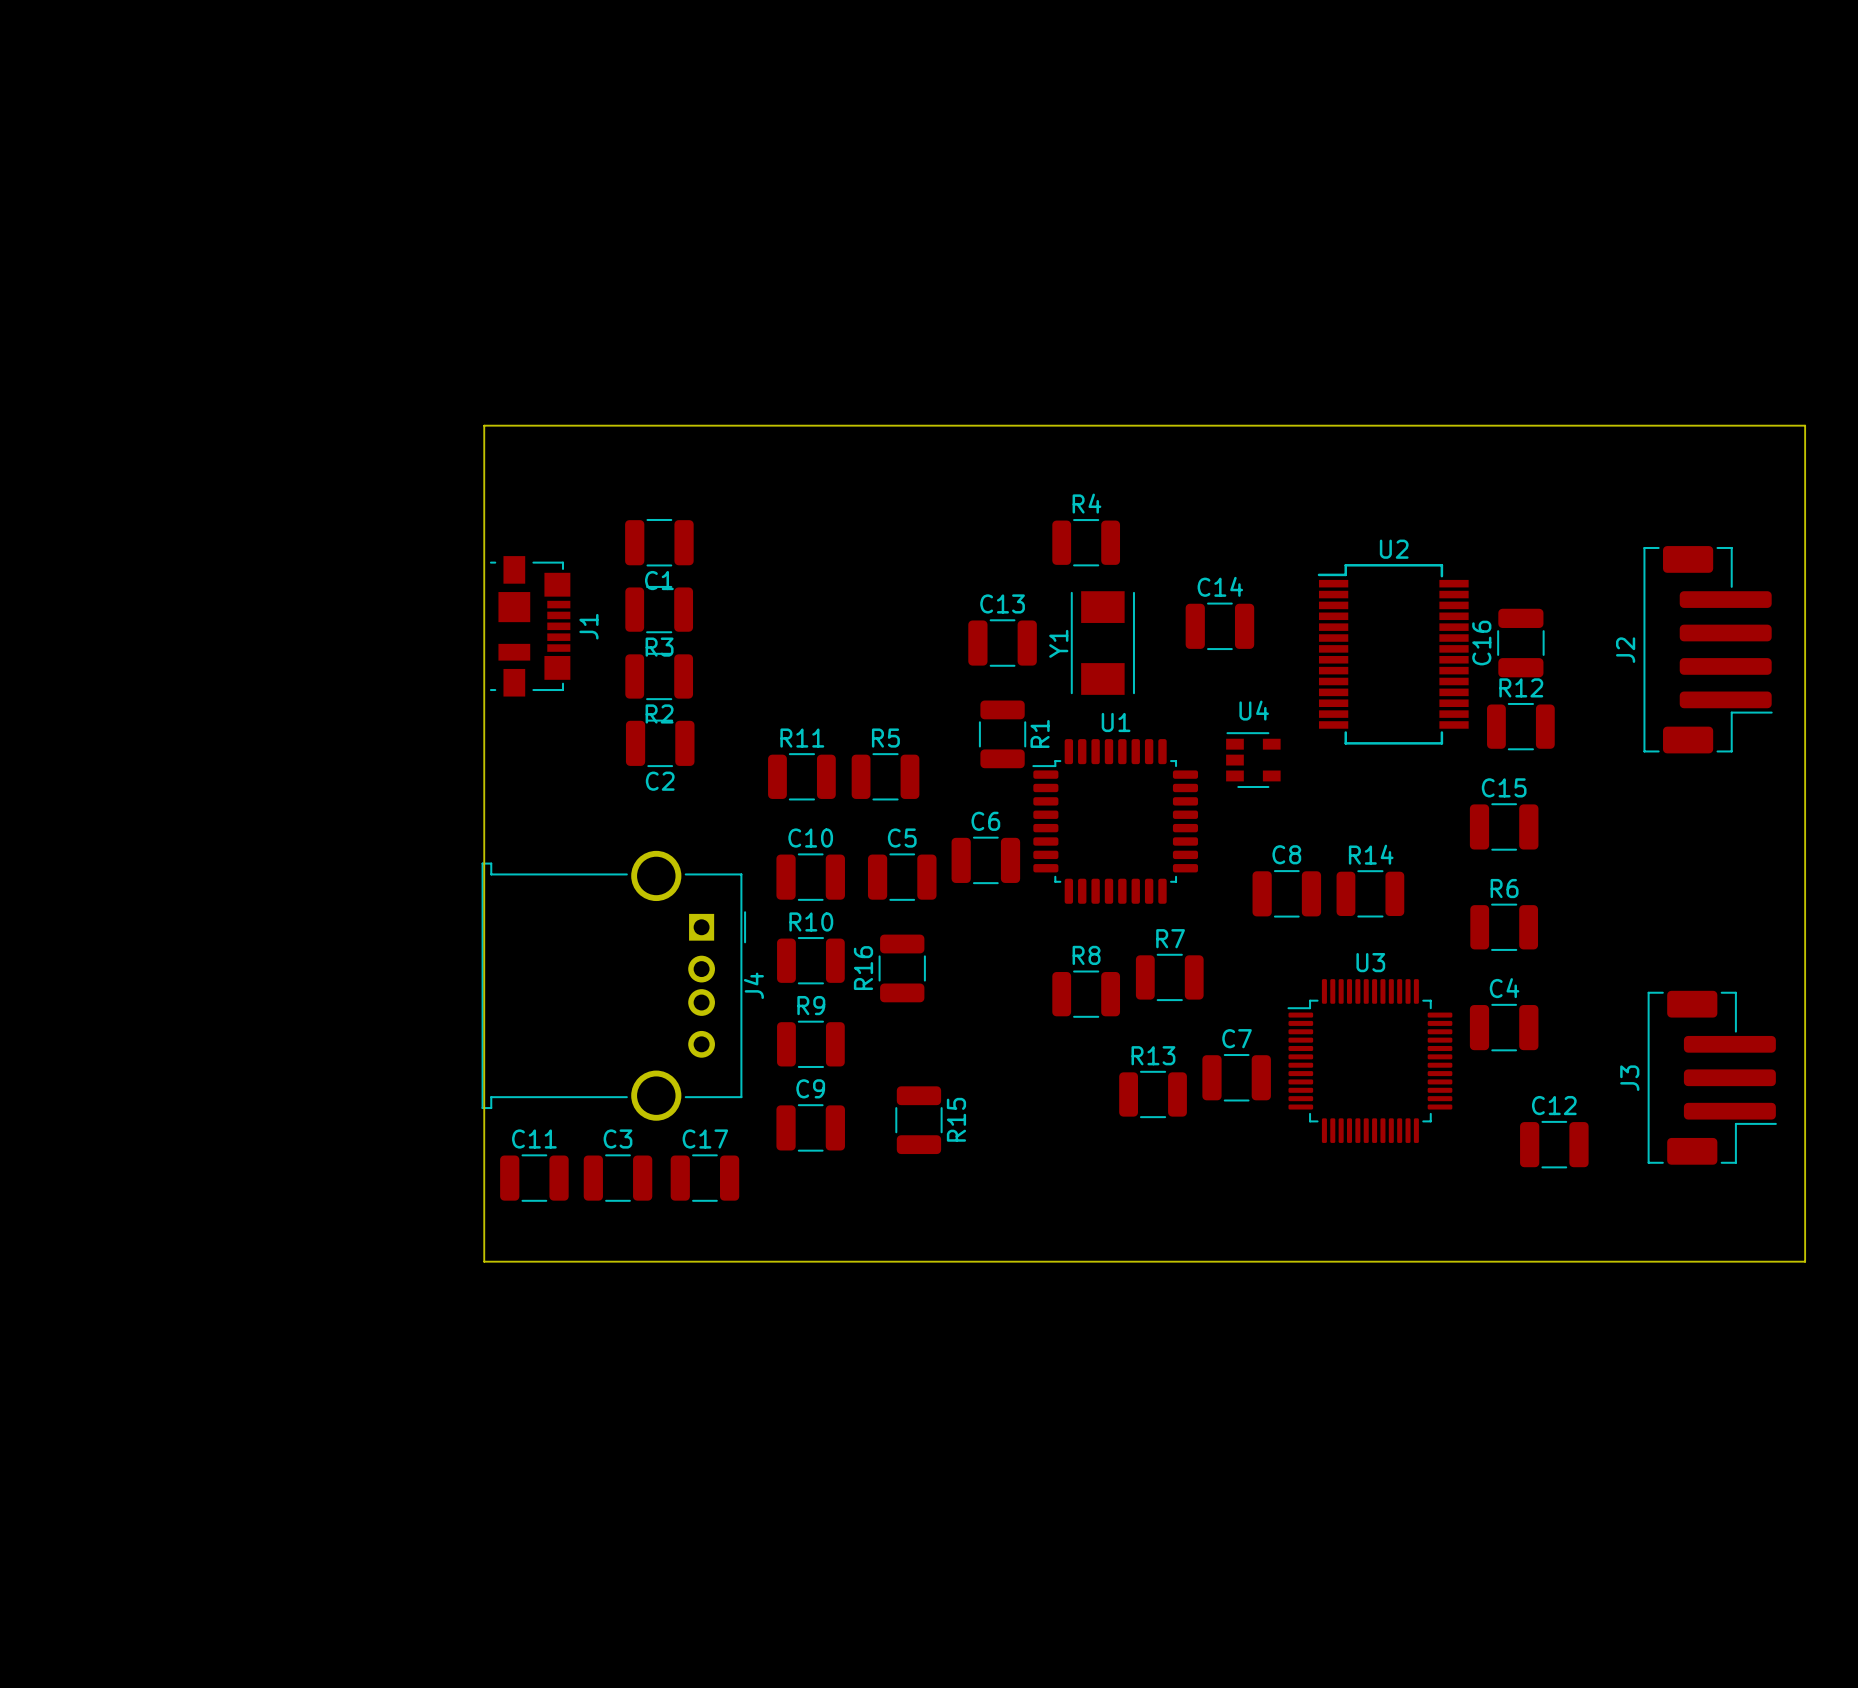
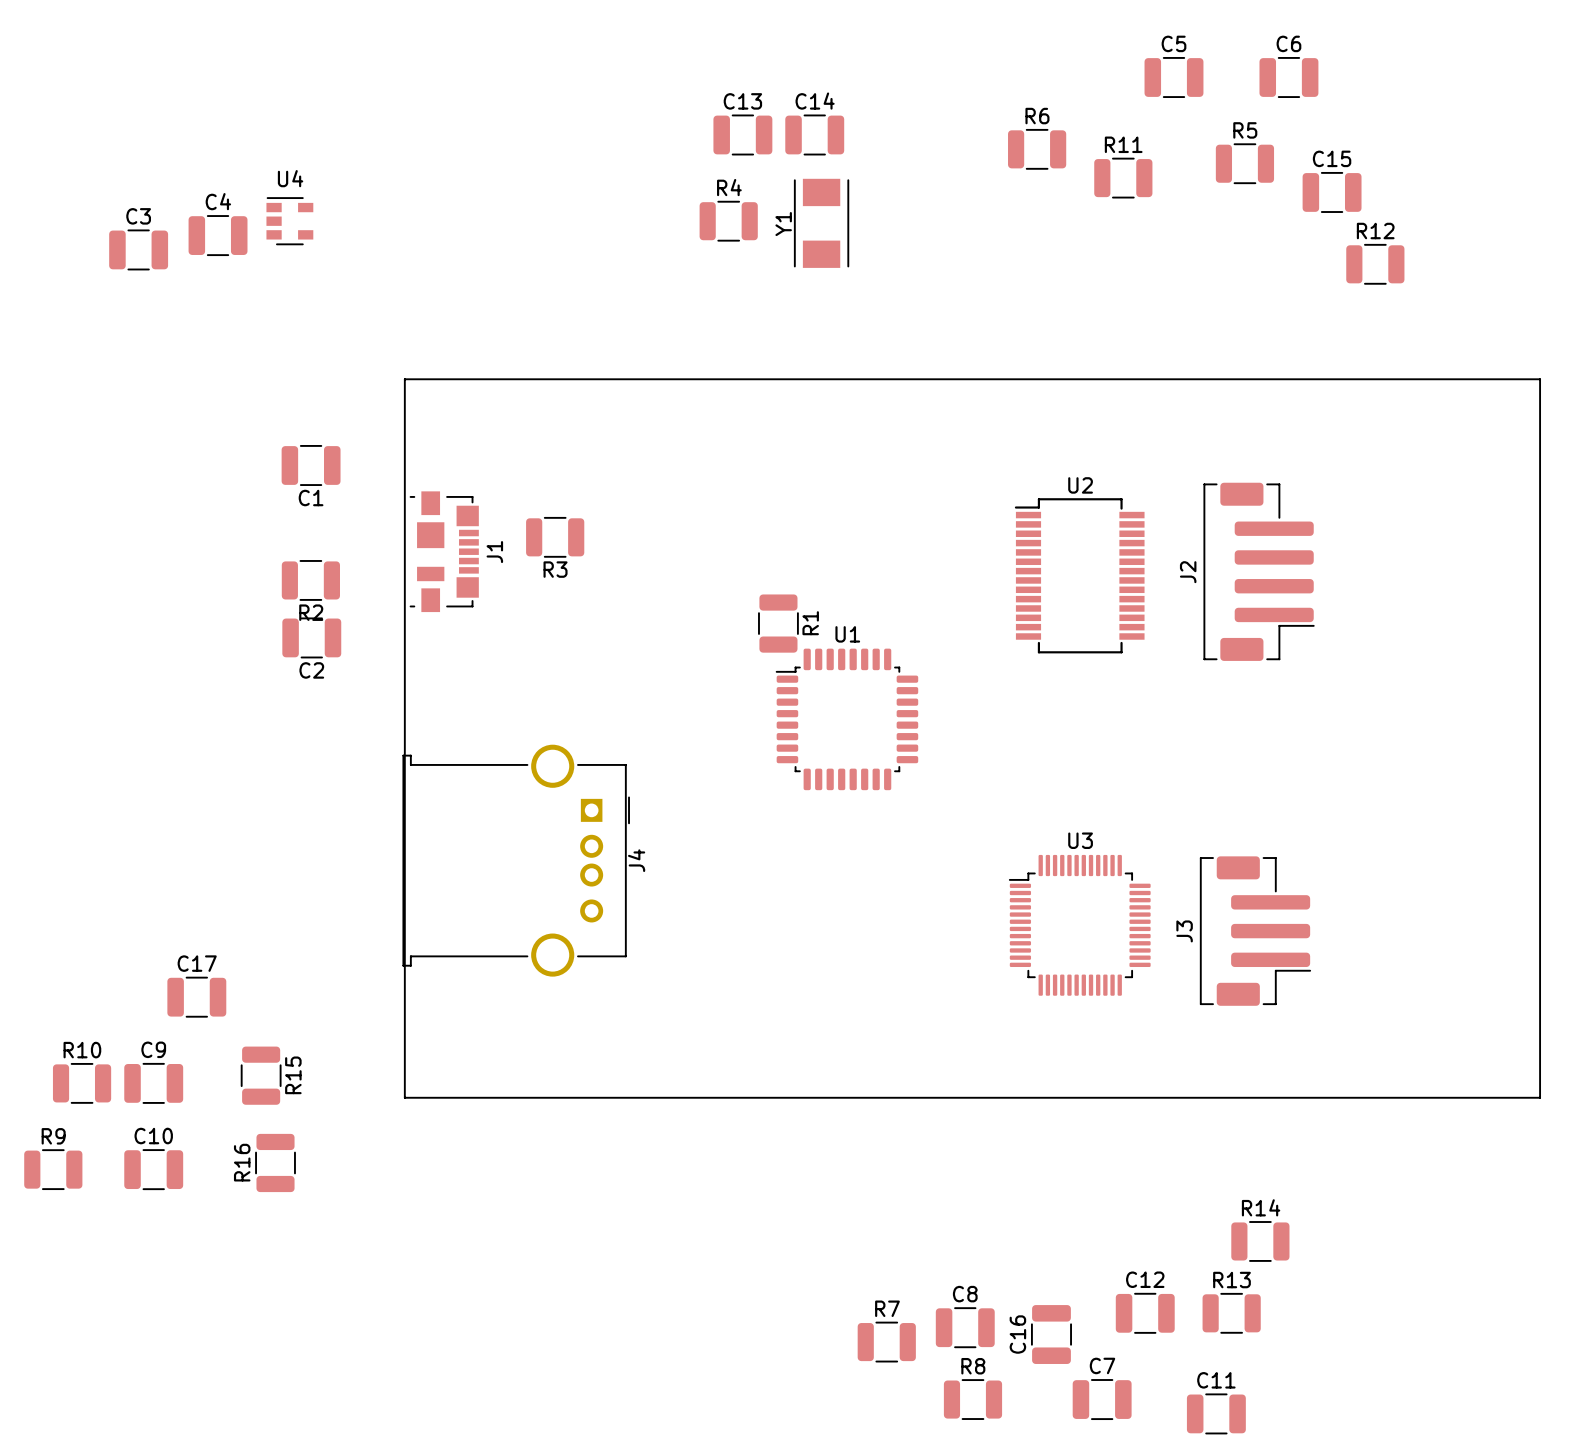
C1 position: (659, 542) -> (311, 465)
R4 position: (1086, 542) -> (728, 221)
C14 position: (1219, 626) -> (814, 134)
C13 position: (1002, 643) -> (742, 134)
Y1 position: (1102, 643) -> (821, 223)
C16 position: (1520, 643) -> (1051, 1334)
J2 position: (1708, 649) -> (1259, 571)
U2 position: (1393, 654) -> (1079, 575)
R2 position: (659, 676) -> (310, 580)
R12 position: (1520, 726) -> (1375, 264)
R1 position: (1002, 734) -> (778, 623)
C2 position: (660, 743) -> (311, 637)
U4 position: (1253, 760) -> (289, 221)
R11 position: (801, 776) -> (1123, 178)
R5 position: (885, 776) -> (1244, 163)
U1 position: (1115, 821) -> (847, 719)
C15 position: (1504, 826) -> (1332, 192)
C6 position: (985, 860) -> (1288, 77)
C10 position: (810, 877) -> (153, 1169)
C5 position: (902, 877) -> (1173, 77)
C8 position: (1286, 893) -> (965, 1327)
R14 position: (1370, 893) -> (1260, 1241)
R6 position: (1504, 927) -> (1037, 149)
R10 position: (810, 960) -> (82, 1083)
R16 position: (902, 968) -> (275, 1162)
R7 position: (1169, 977) -> (886, 1342)
R8 position: (1086, 994) -> (972, 1399)
C4 position: (1504, 1027) -> (218, 235)
R9 position: (810, 1044) -> (53, 1169)
U3 position: (1369, 1061) -> (1079, 925)
C7 position: (1236, 1077) -> (1102, 1399)
J3 position: (1712, 1077) -> (1255, 931)
R13 position: (1153, 1094) -> (1231, 1313)
R15 position: (918, 1120) -> (261, 1075)
C9 position: (810, 1127) -> (153, 1083)
C12 position: (1554, 1144) -> (1145, 1313)
C11 position: (534, 1178) -> (1216, 1413)
C3 position: (618, 1178) -> (138, 249)
C17 position: (704, 1178) -> (196, 997)

